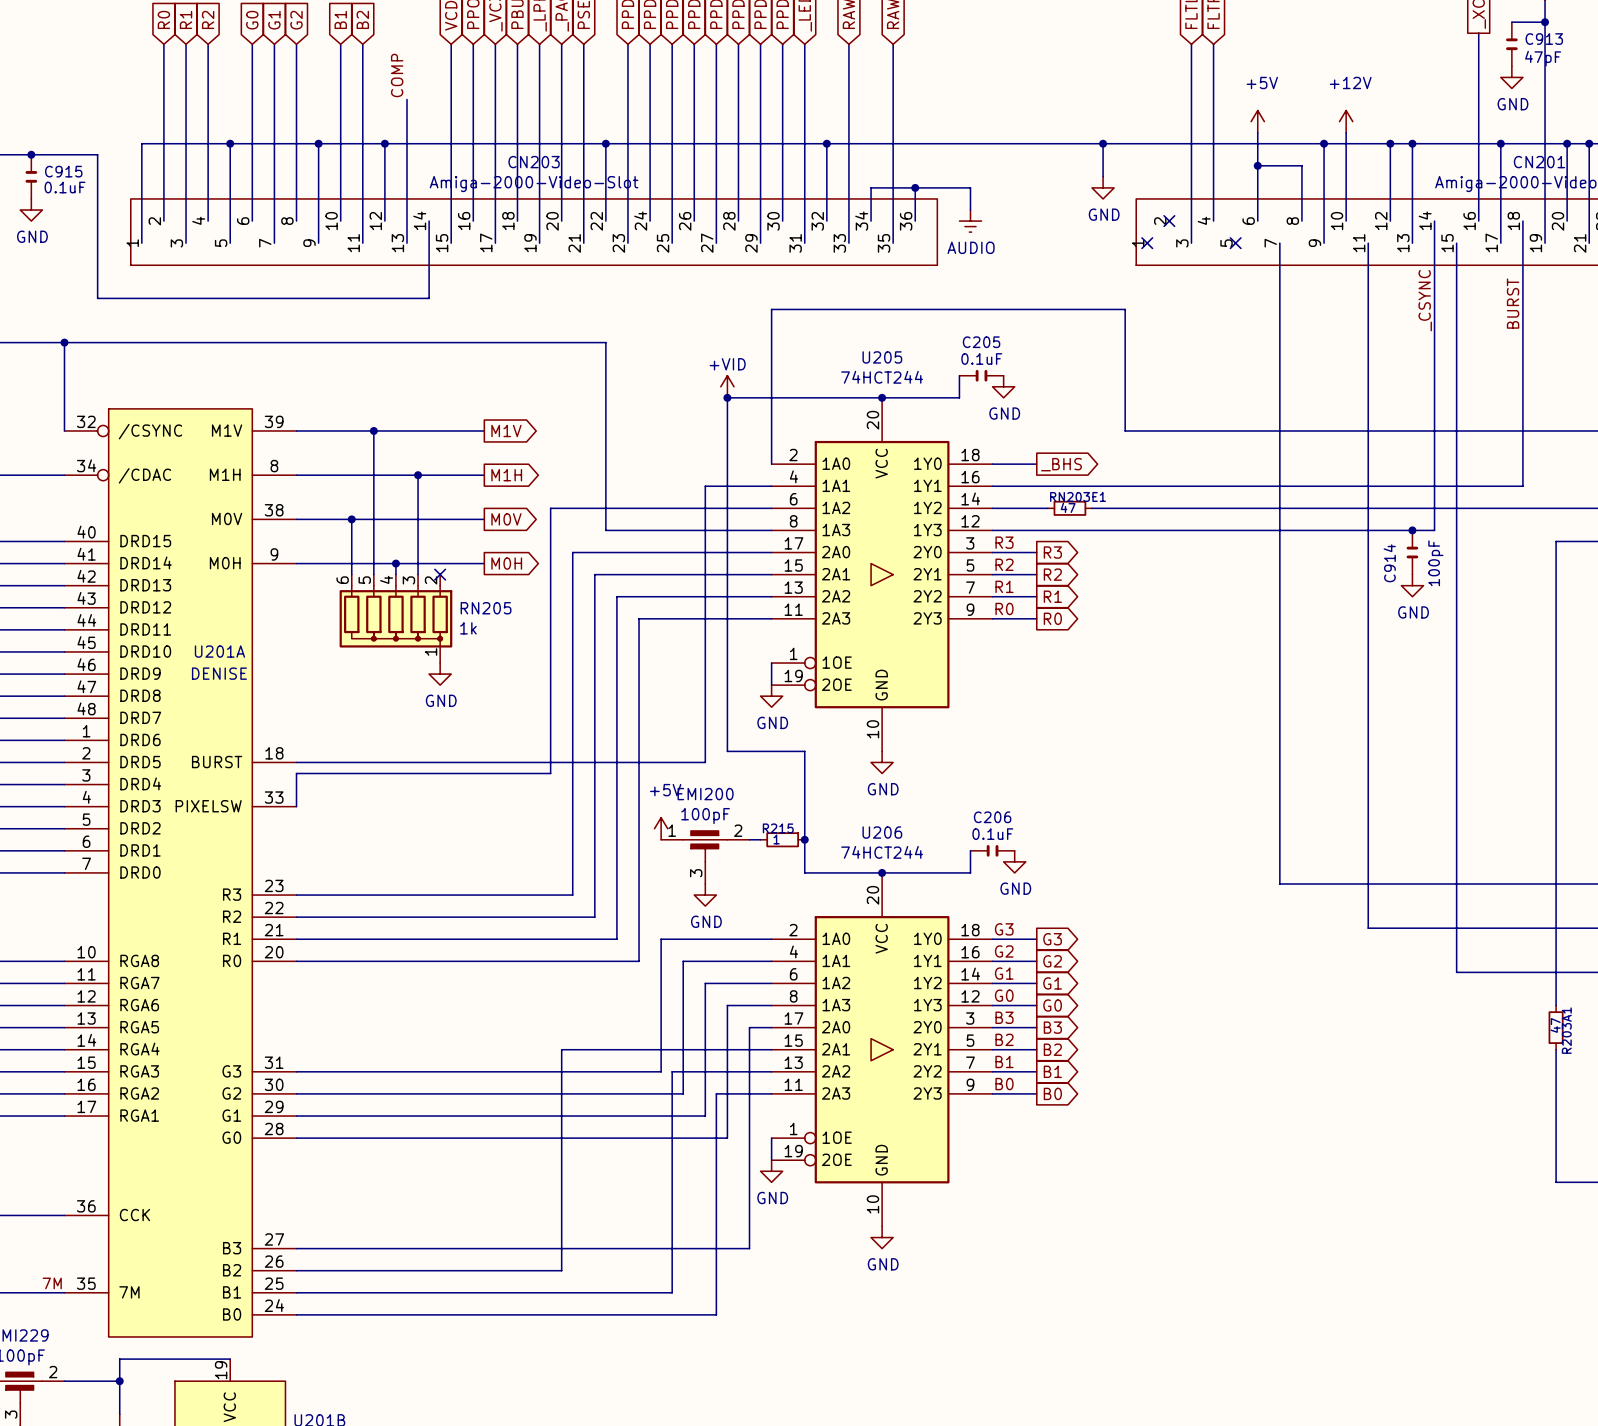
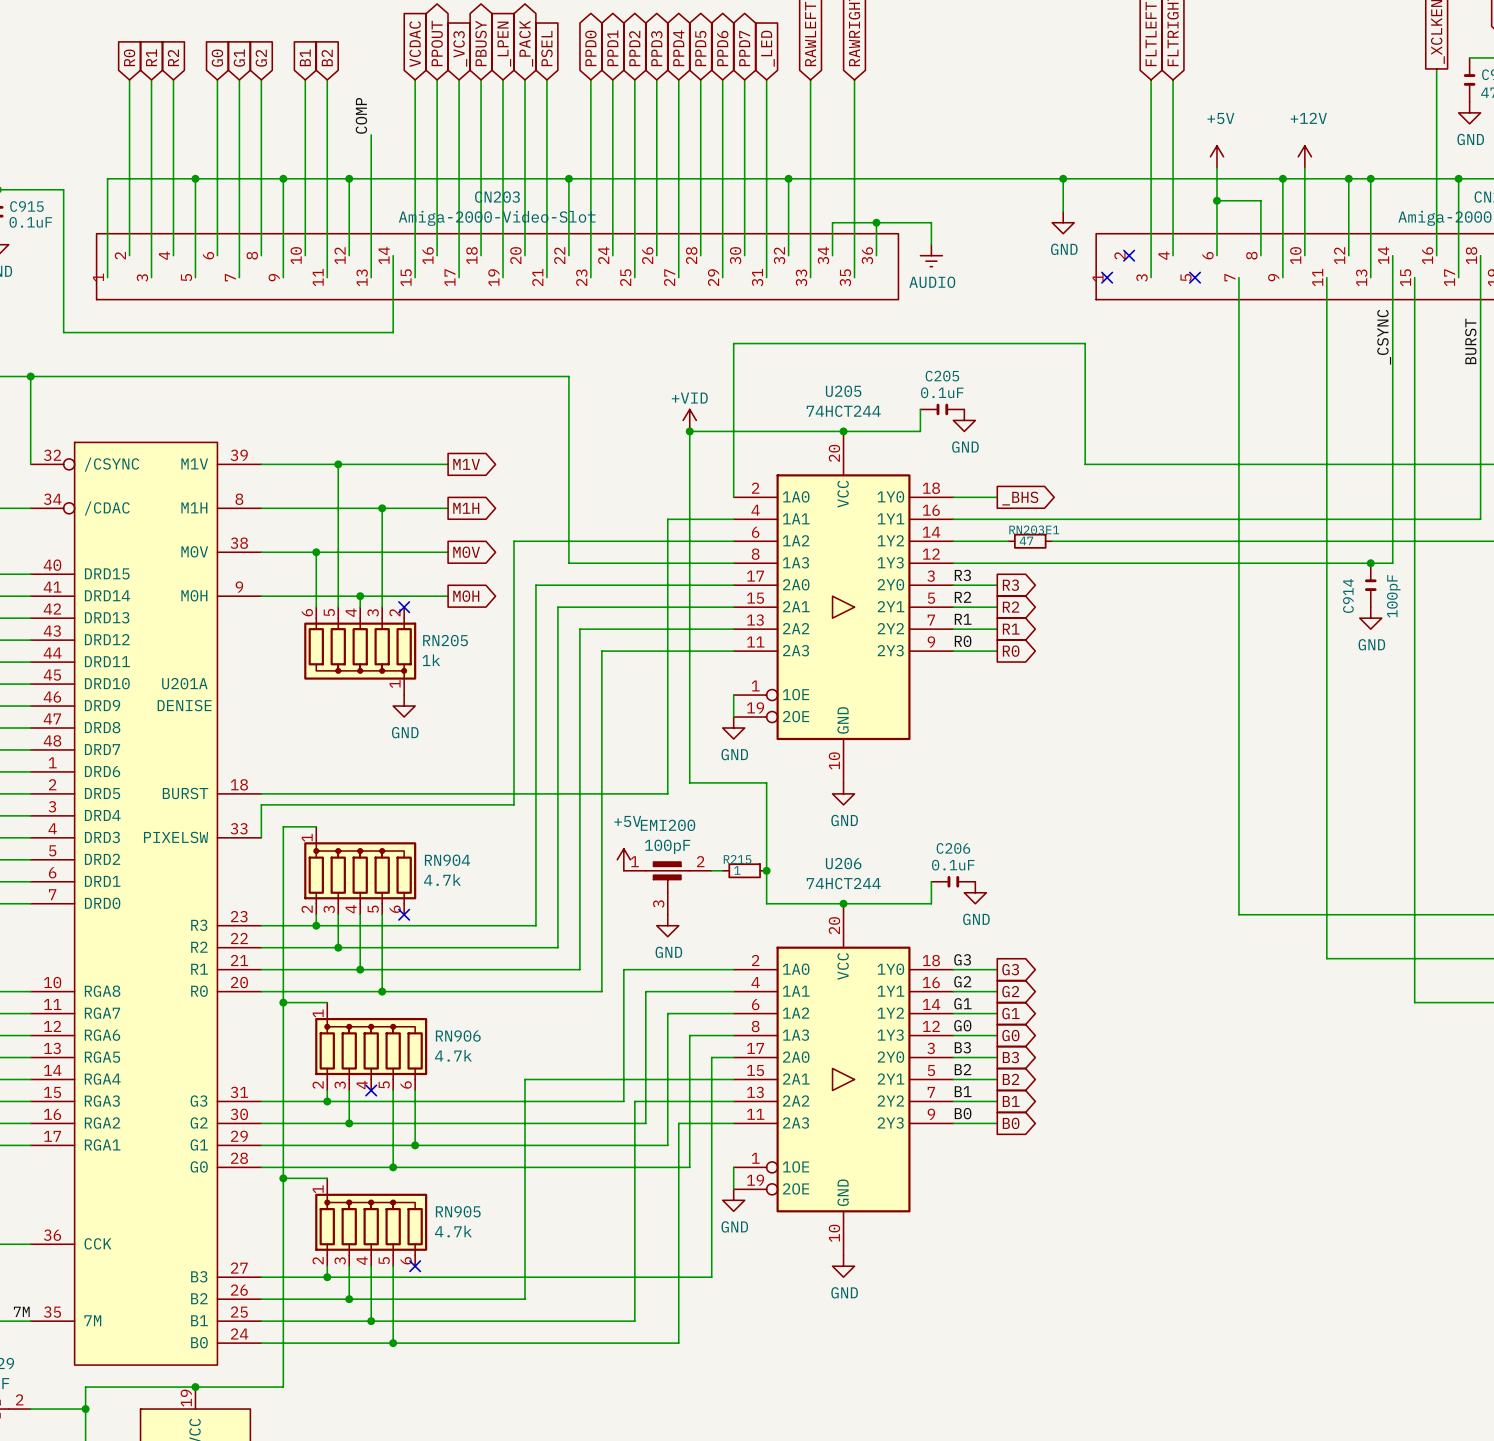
wire: none -> (316, 826) (283, 826) (283, 1387) (195, 1387)
RN904: none -> 4.7k (360, 870)
wire: none -> (316, 914) (316, 925)
wire: none -> (338, 914) (338, 947)
wire: none -> (360, 914) (360, 969)
wire: none -> (382, 914) (382, 991)
no-connect mark: none -> (404, 914)
junction: none -> (316, 925)
junction: none -> (338, 947)
junction: none -> (360, 969)
junction: none -> (382, 991)
wire: none -> (283, 1002) (327, 1002)
junction: none -> (283, 1002)
RN906: none -> 4.7k (371, 1046)
wire: none -> (327, 1090) (327, 1101)
wire: none -> (349, 1090) (349, 1123)
no-connect mark: none -> (371, 1090)
wire: none -> (393, 1090) (393, 1167)
wire: none -> (415, 1090) (415, 1145)
junction: none -> (327, 1101)
junction: none -> (349, 1123)
junction: none -> (415, 1145)
junction: none -> (393, 1167)
wire: none -> (283, 1178) (327, 1178)
junction: none -> (283, 1178)
RN905: none -> 4.7k (371, 1222)
wire: none -> (327, 1266) (327, 1277)
wire: none -> (349, 1266) (349, 1299)
wire: none -> (371, 1266) (371, 1321)
wire: none -> (393, 1266) (393, 1343)
no-connect mark: none -> (415, 1266)
junction: none -> (327, 1277)
junction: none -> (349, 1299)
junction: none -> (371, 1321)
junction: none -> (393, 1343)
junction: none -> (195, 1387)

